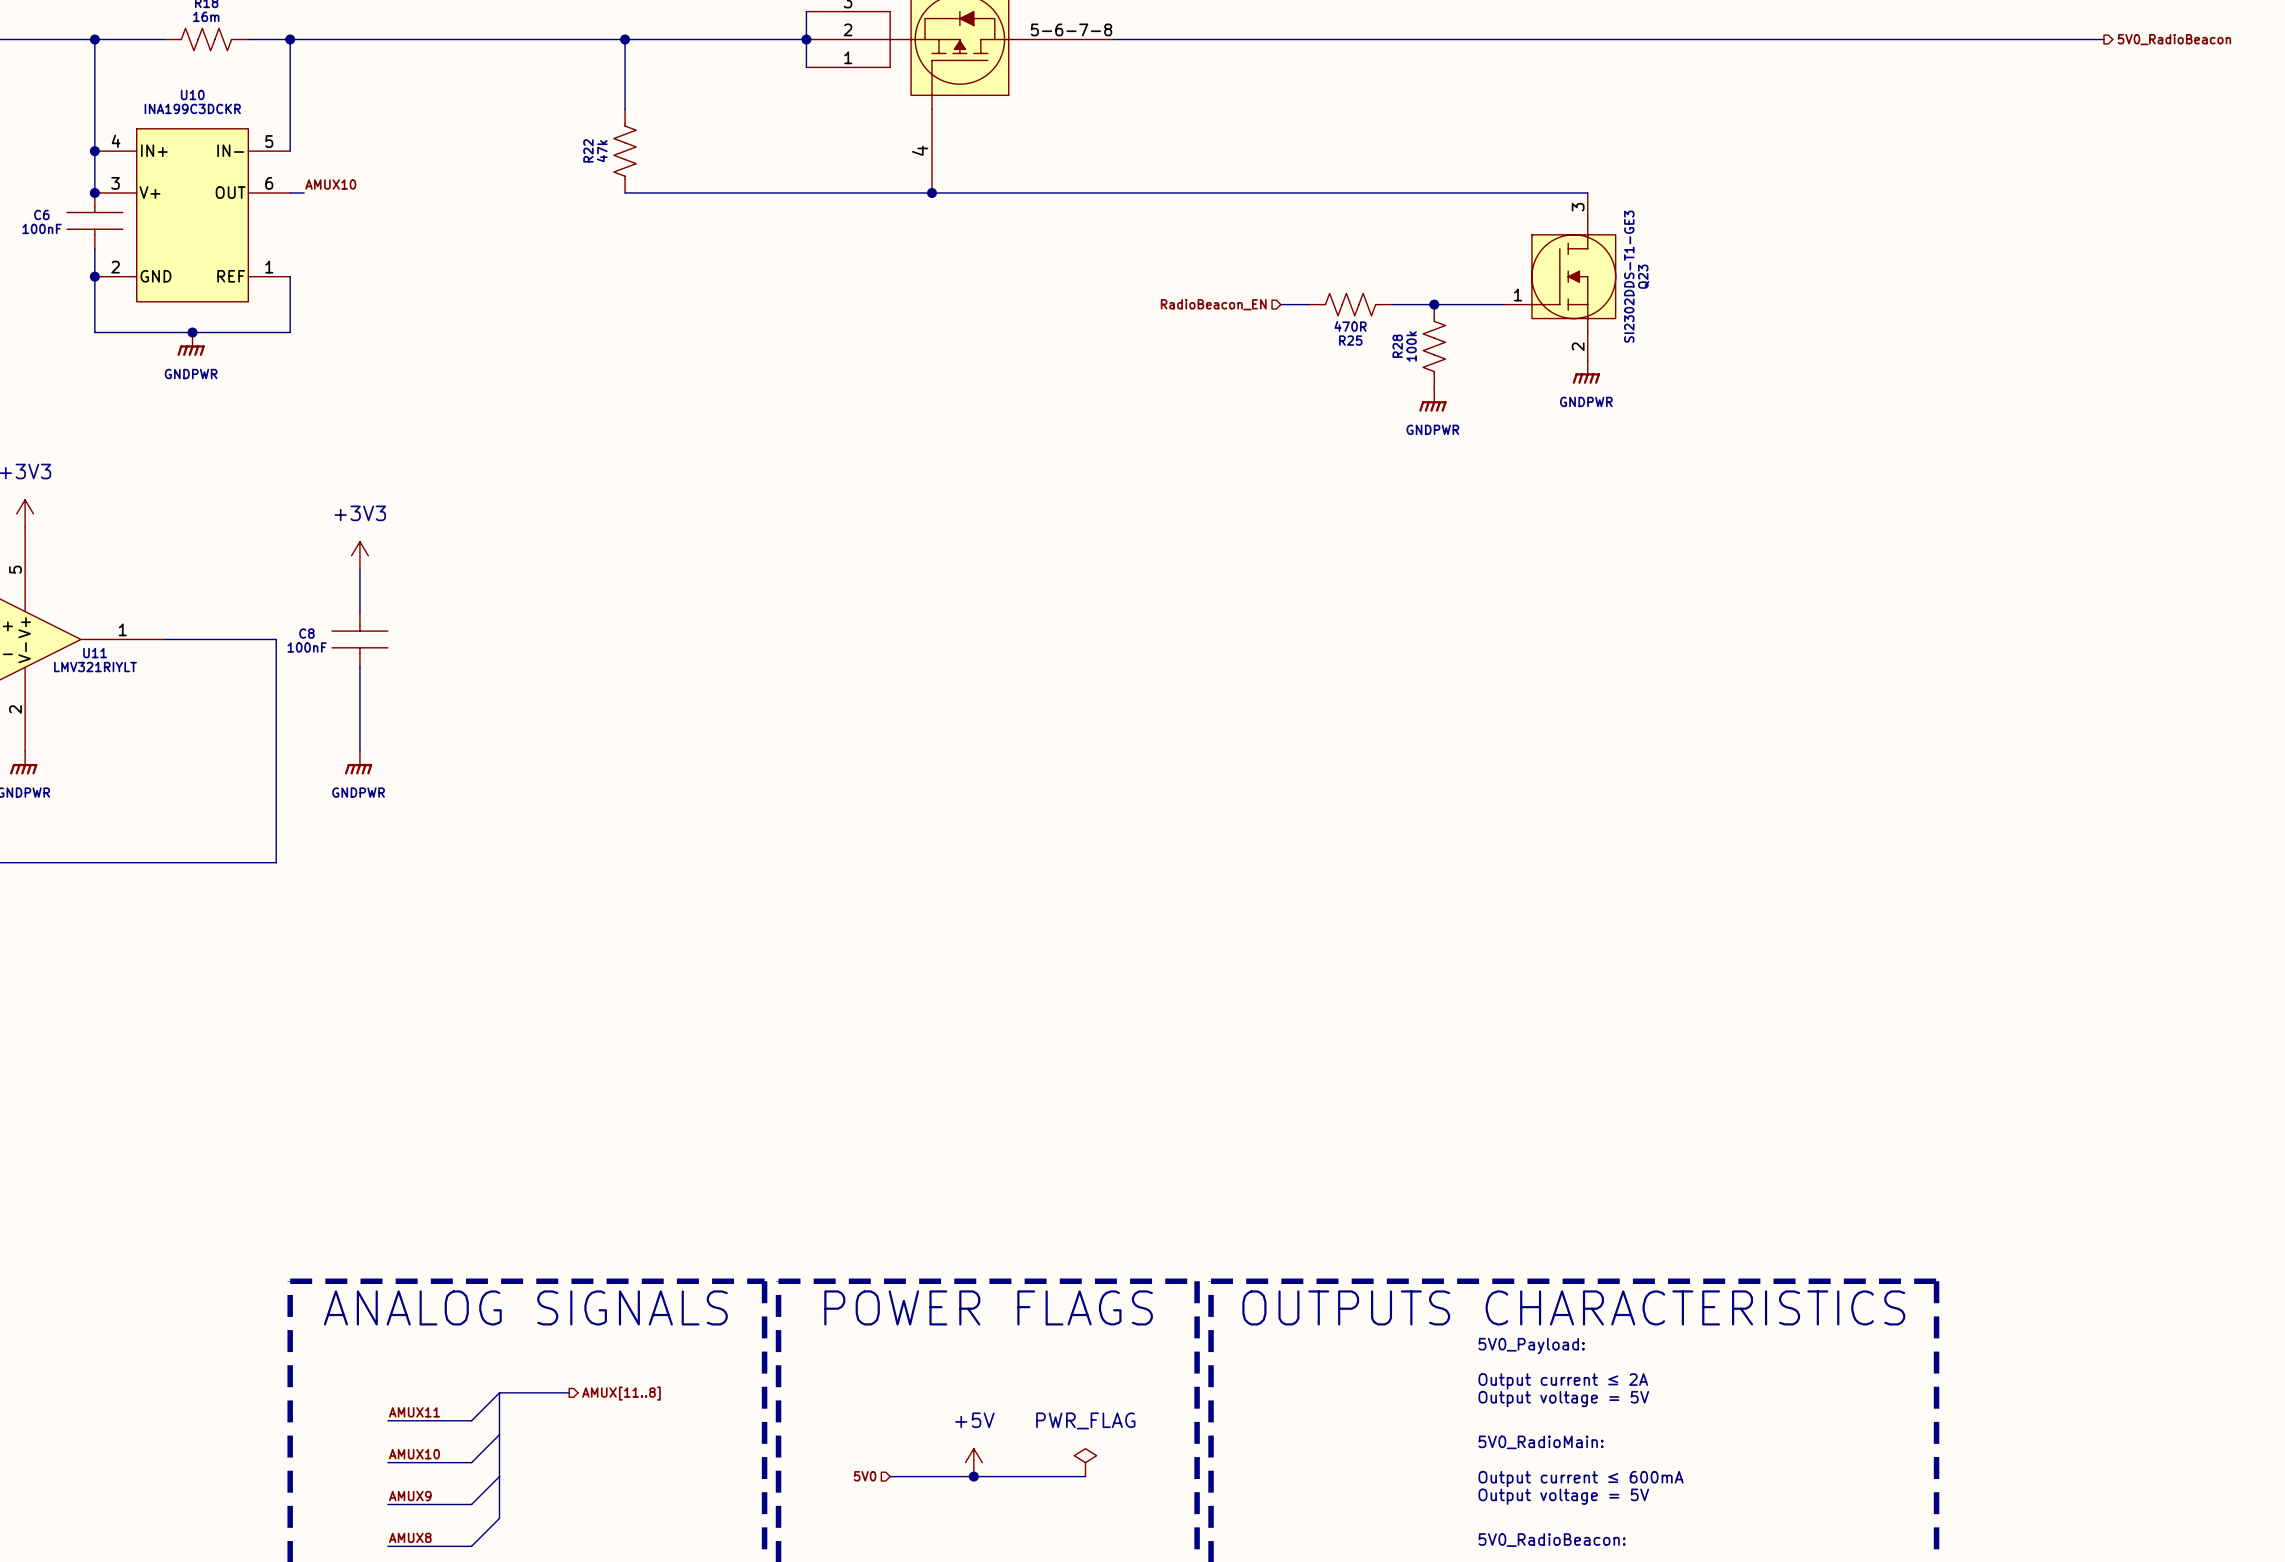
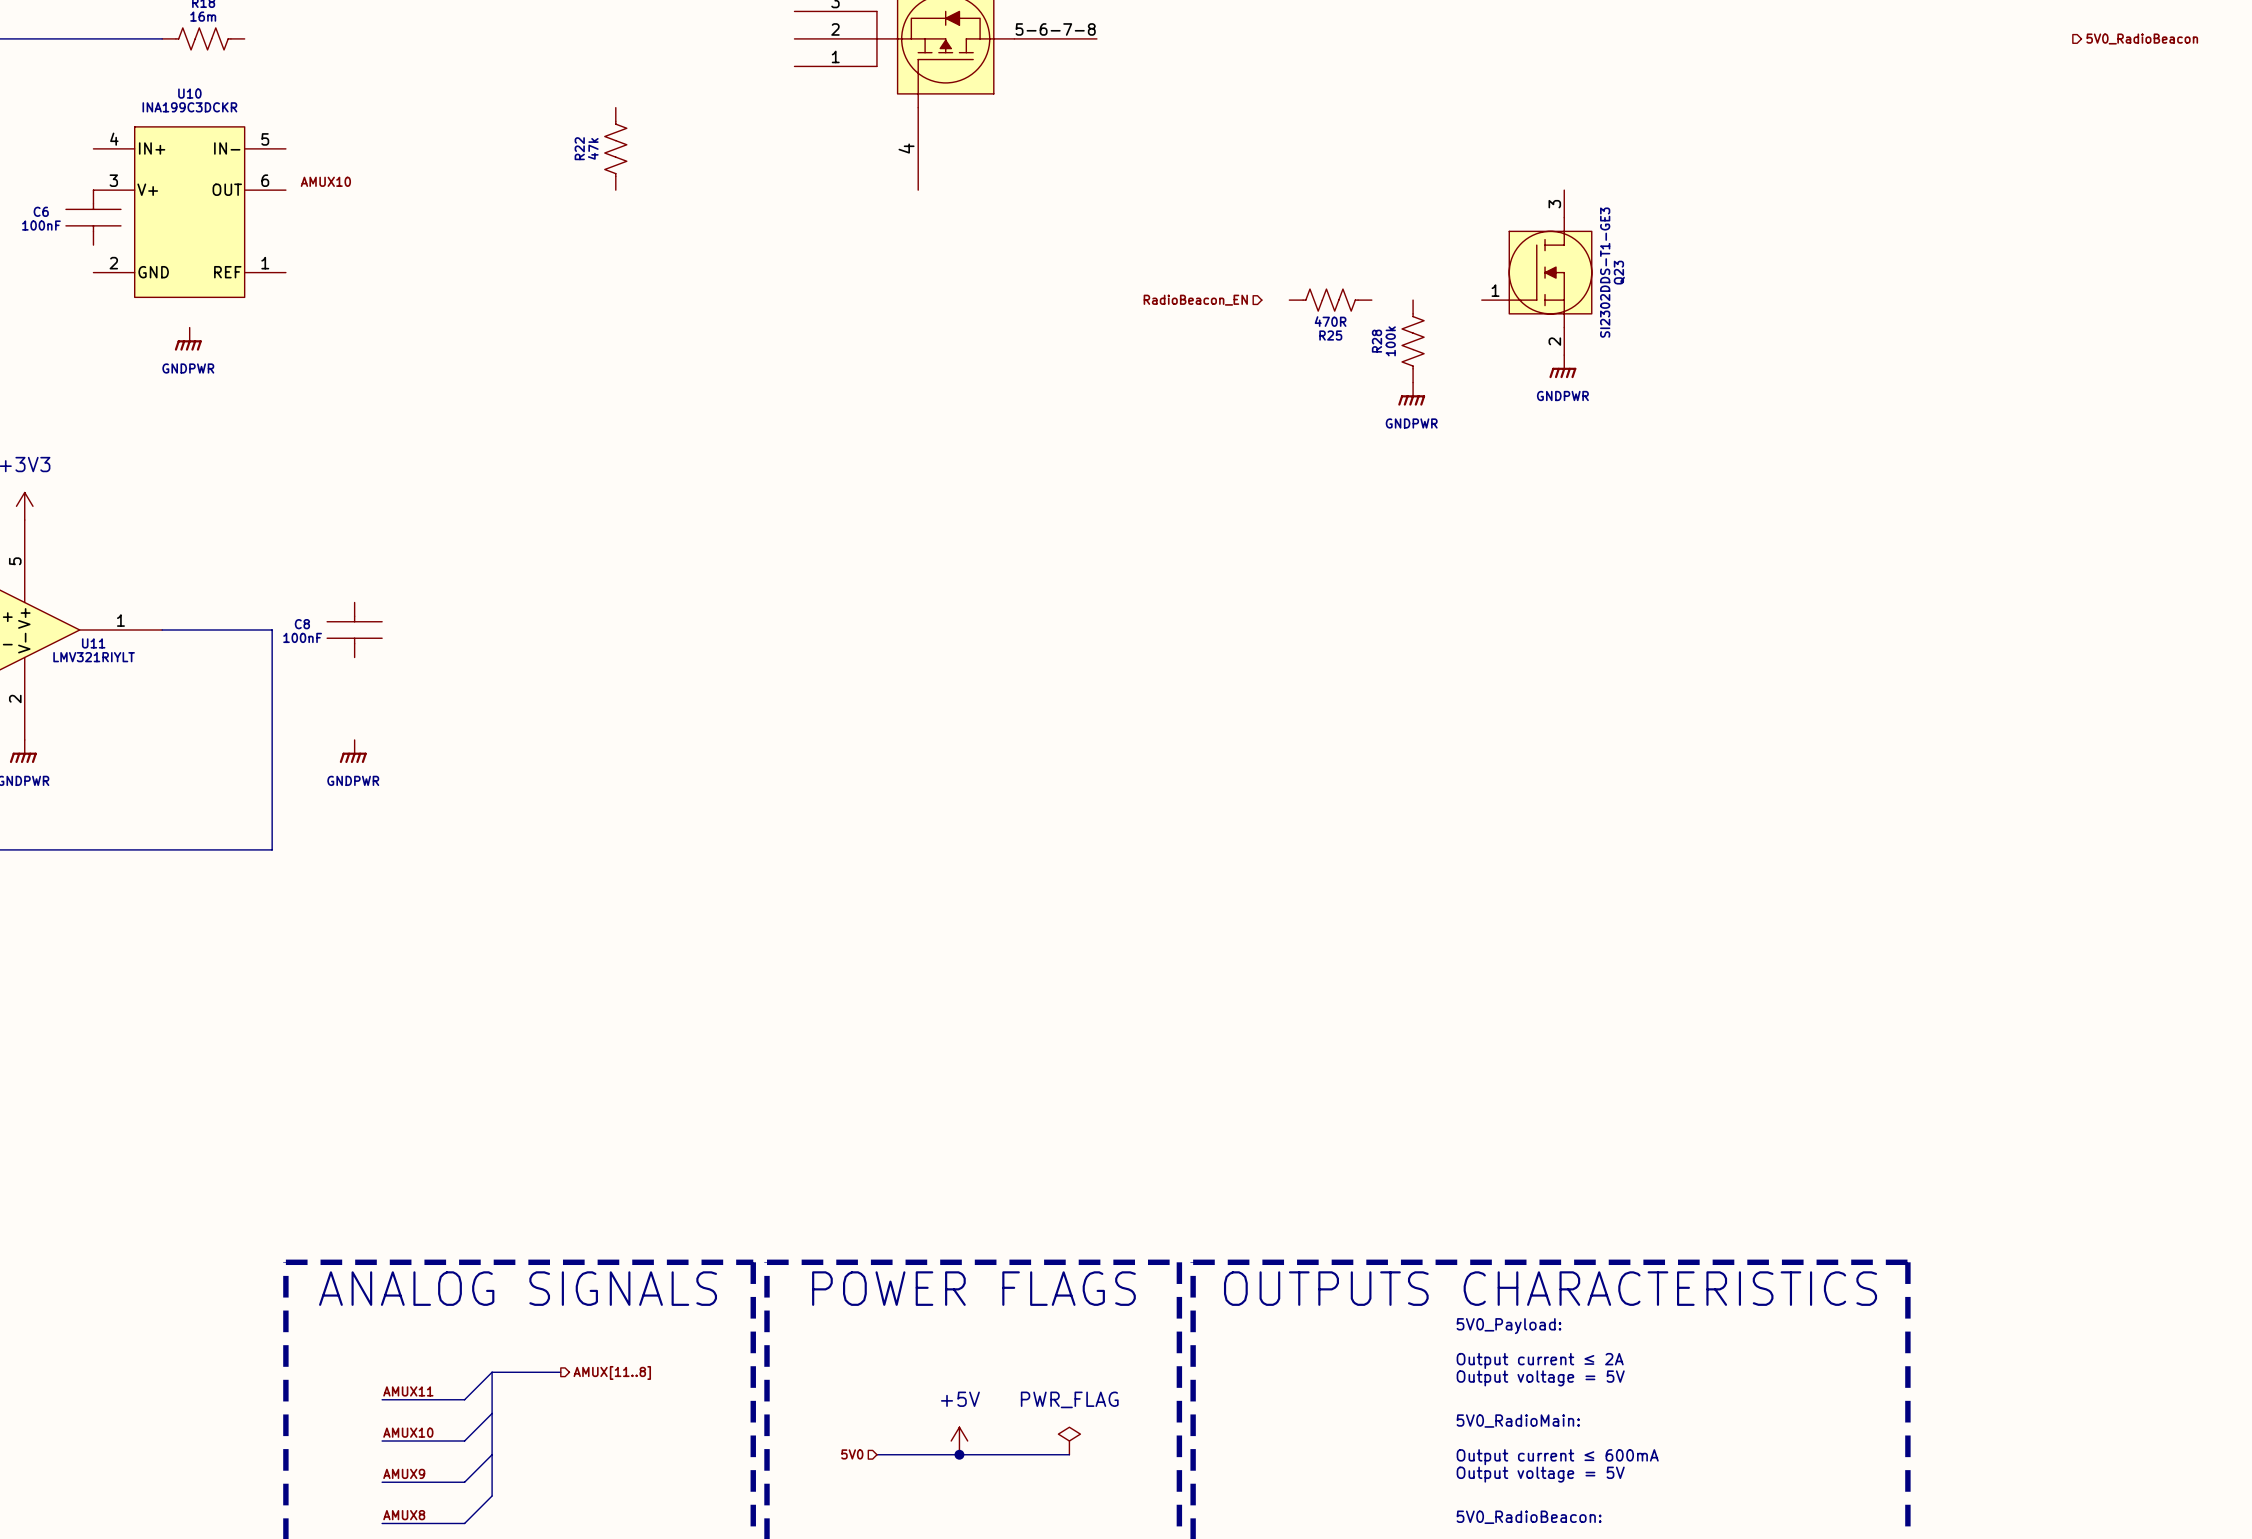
wire: (806, 11) (806, 67) -> none
wire: (94, 39) (94, 192) -> none
junction: (94, 39) -> none
wire: (248, 39) (806, 39) -> none
wire: (290, 39) (290, 151) -> none
junction: (290, 39) -> none
wire: (625, 39) (625, 109) -> none
junction: (625, 39) -> none
junction: (806, 39) -> none
wire: (1113, 39) (2103, 39) -> none
junction: (94, 151) -> none
junction: (94, 192) -> none
wire: (290, 192) (304, 192) -> none
wire: (625, 192) (1587, 192) -> none
junction: (932, 192) -> none
wire: (94, 248) (94, 332) (290, 332) (290, 276) -> none
junction: (94, 276) -> none
wire: (1280, 304) (1308, 304) -> none
wire: (1392, 304) (1504, 304) -> none
junction: (1434, 304) -> none
junction: (192, 332) -> none
power symbol: +3V3 (359, 555) -> none
wire: (359, 569) (359, 611) -> none
wire: (359, 667) (359, 751) -> none

